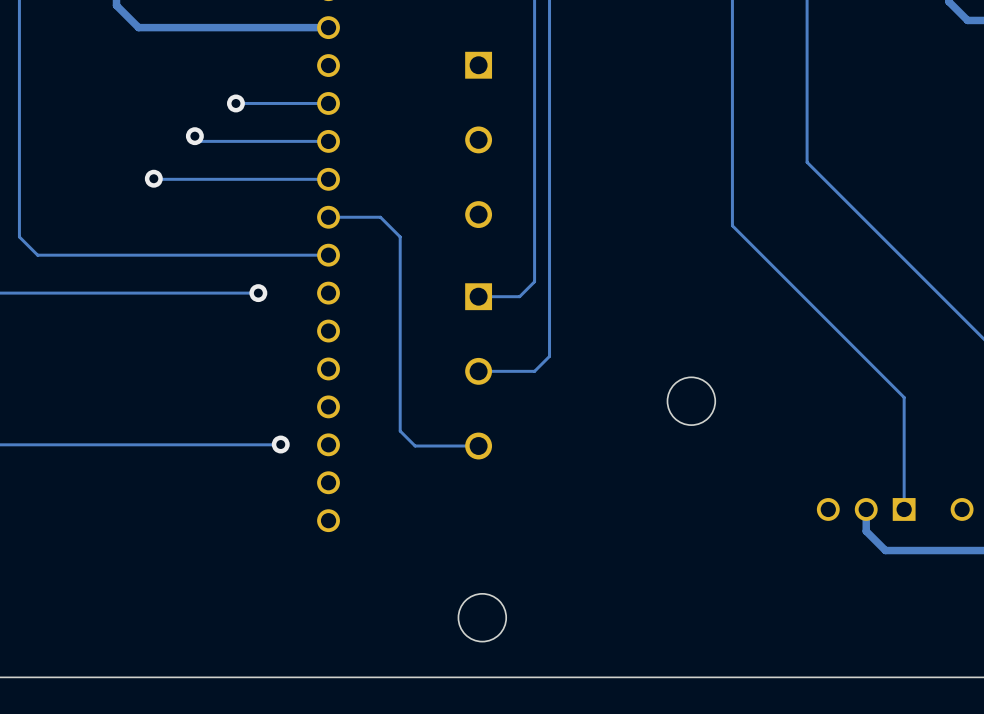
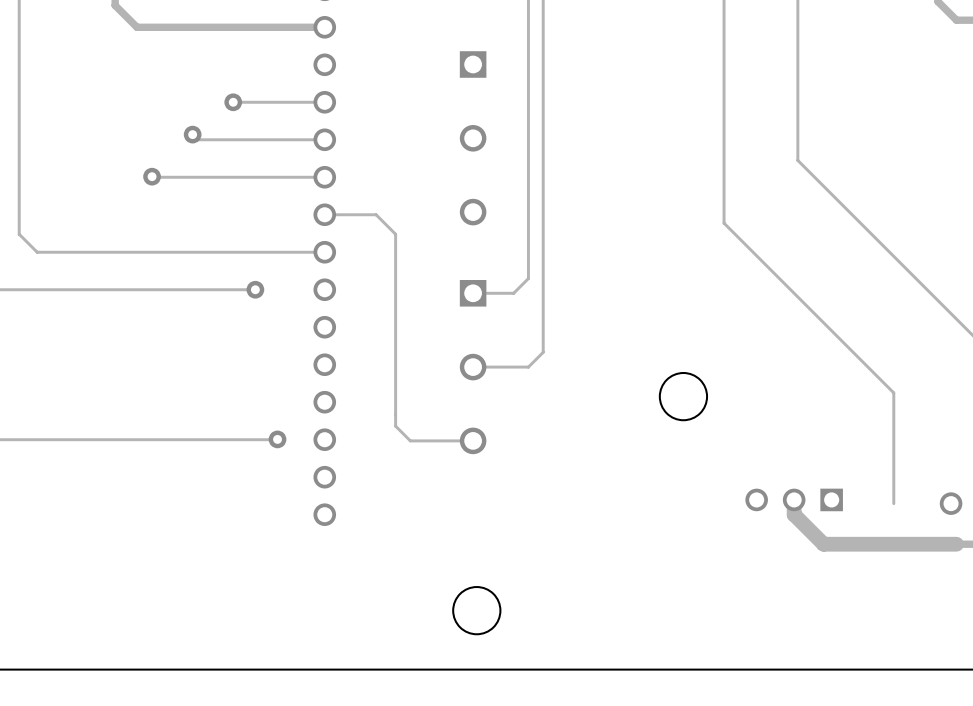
track: (866, 509) (866, 531) (885, 550) -> (794, 499) (794, 514) (823, 544) (875, 544)
part position: (866, 509) -> (794, 499)
track width: thin (967, 550) (885, 550) -> thick (956, 544) (875, 544)

